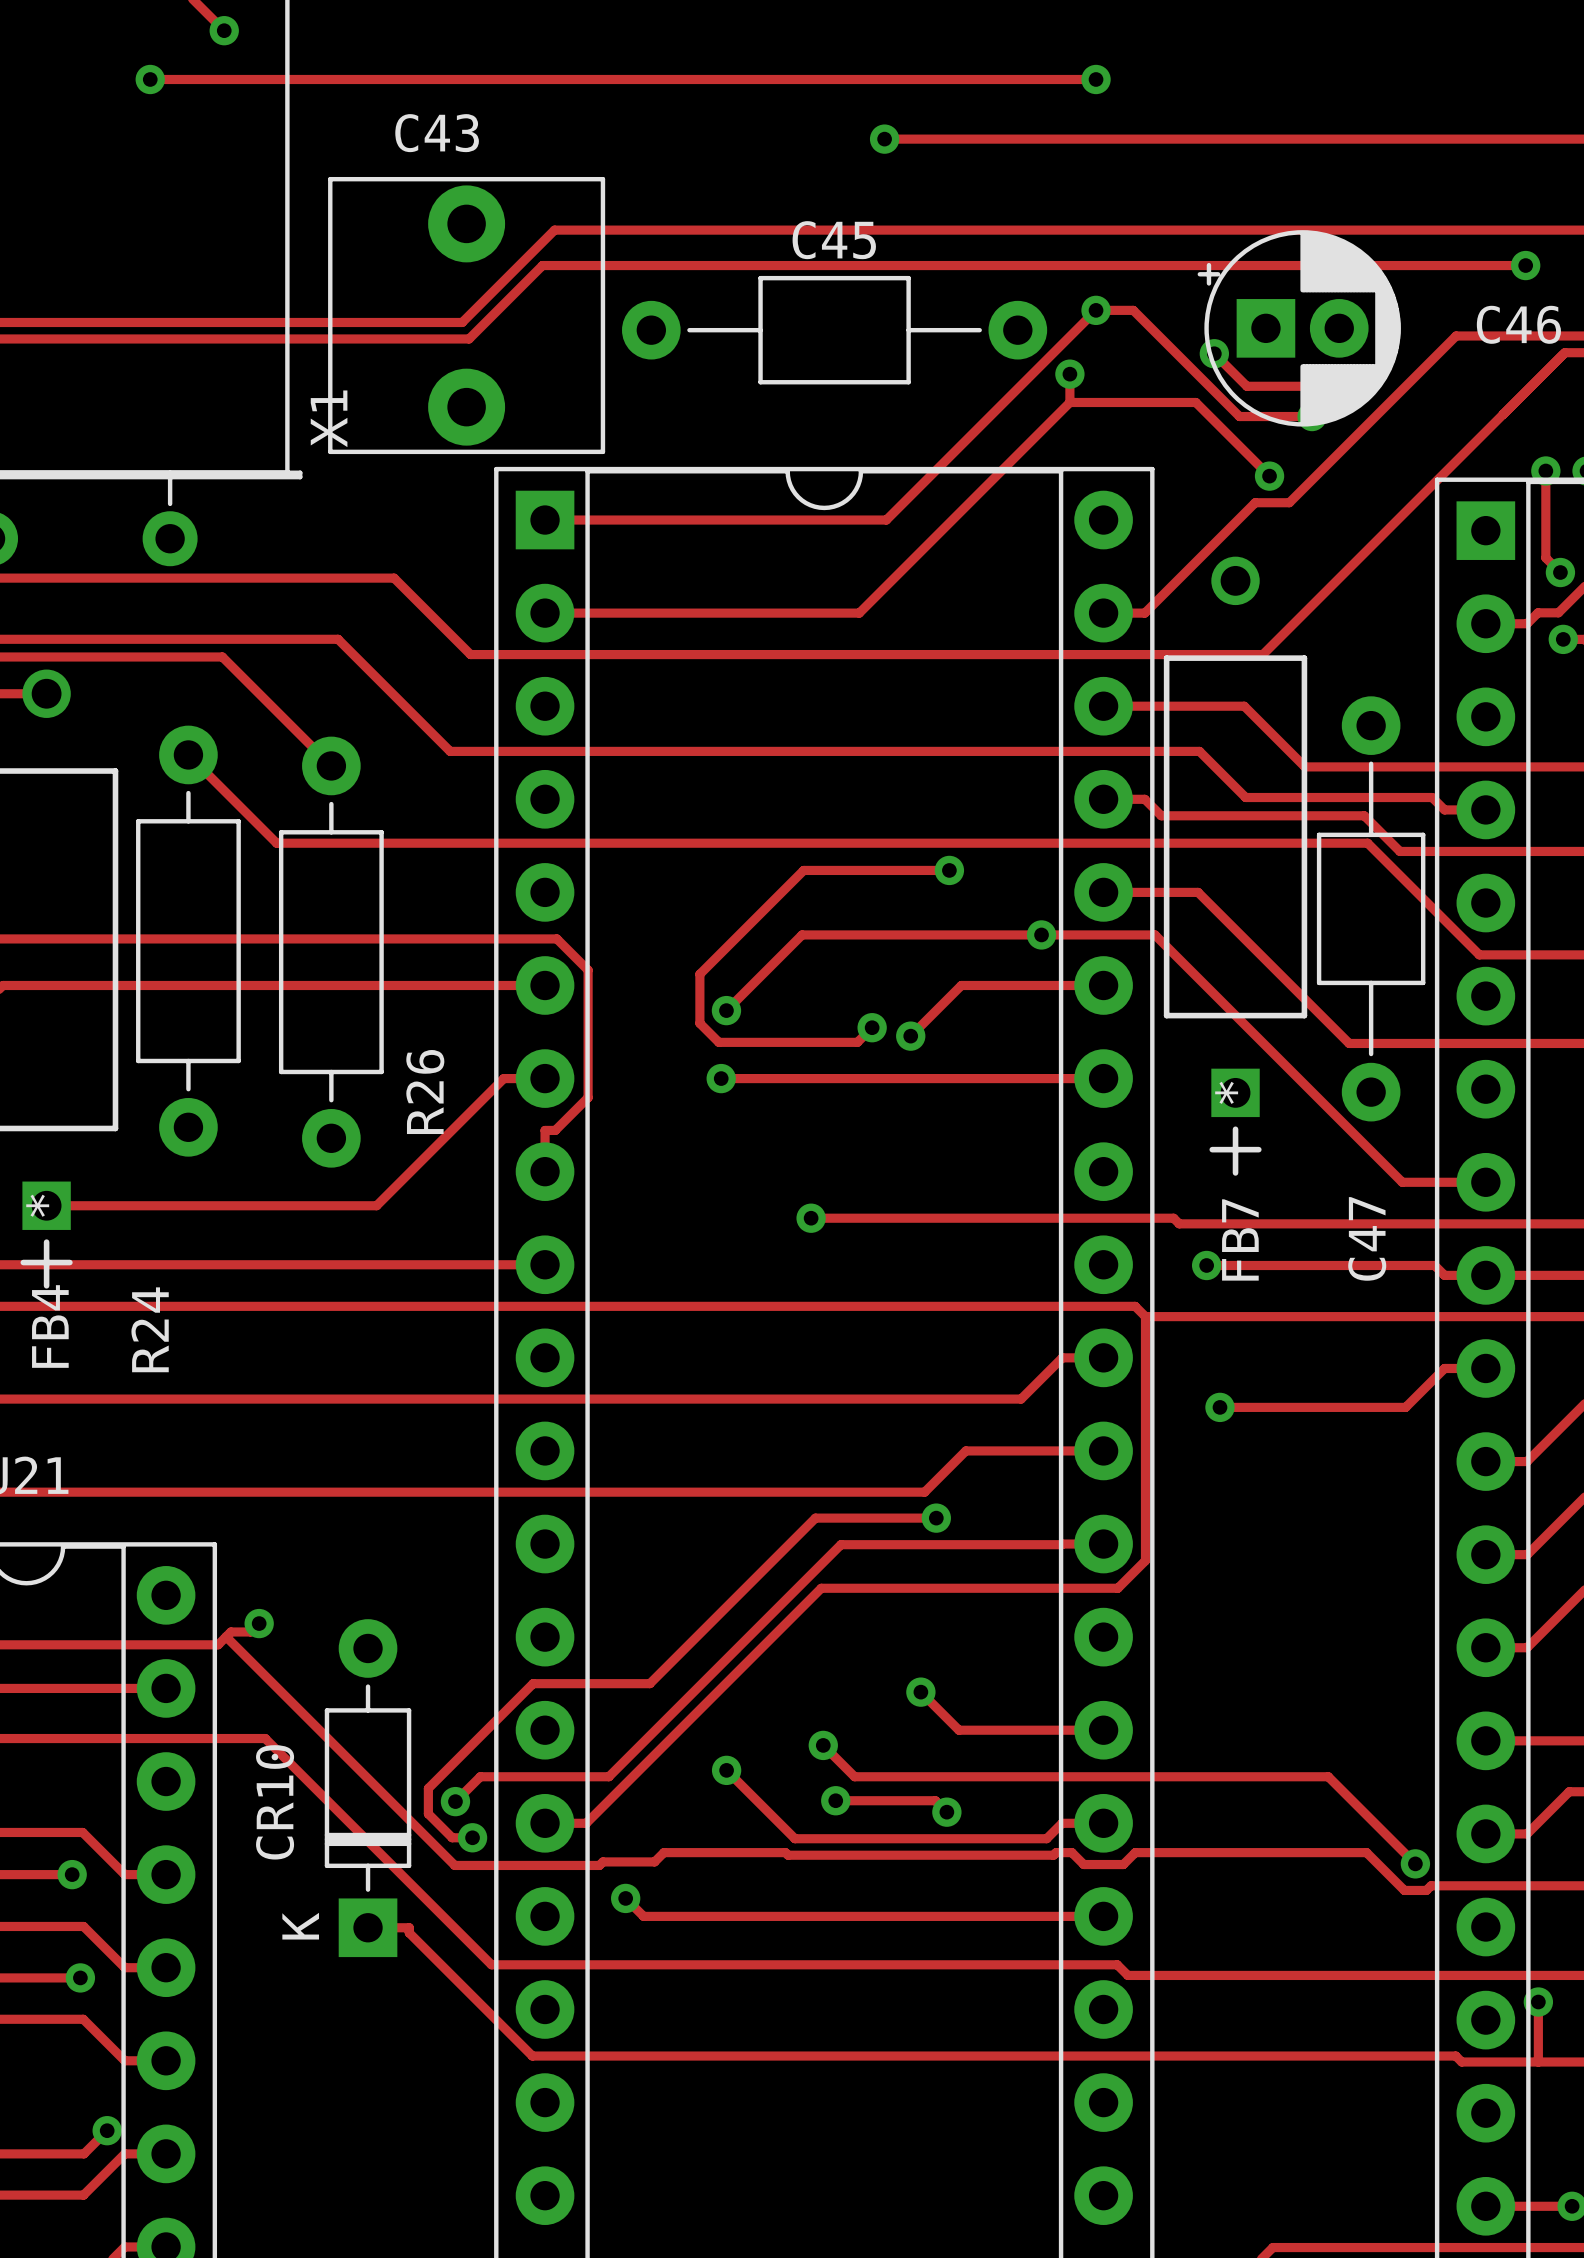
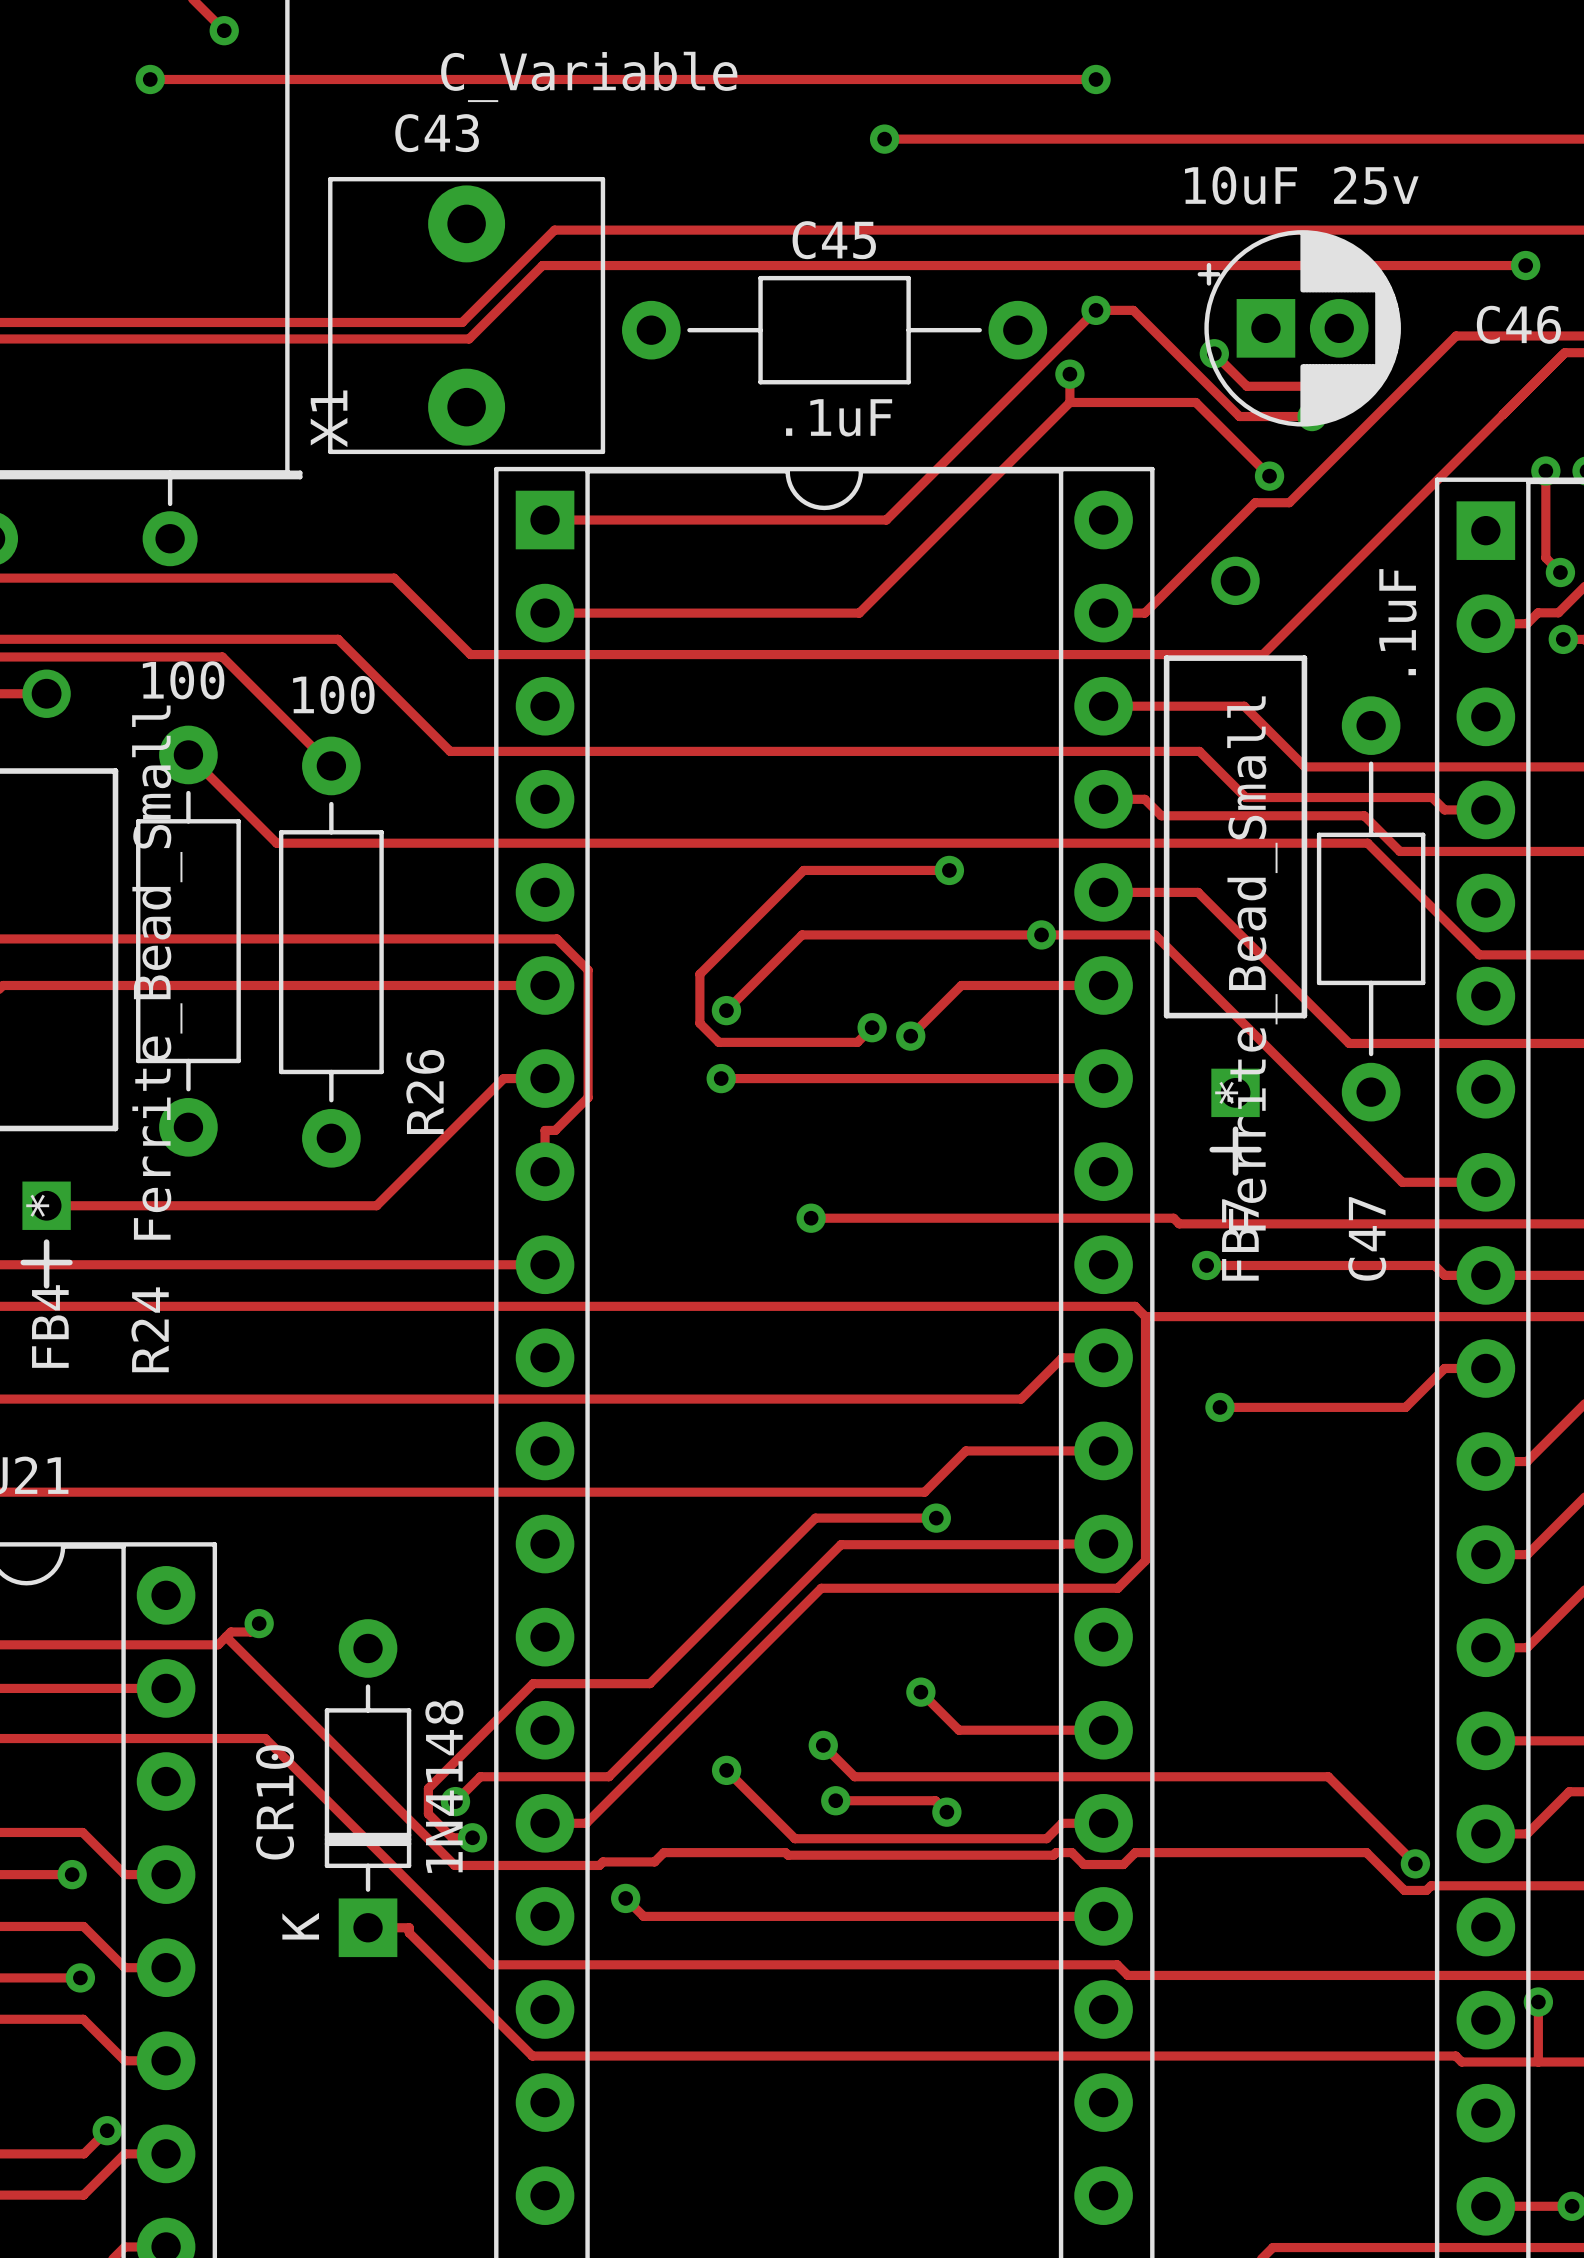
C43 value: none -> C_Variable (589, 76)
C46 value: none -> 10uF 25v (1301, 185)
C45 value: none -> .1uF (839, 417)
C47 value: none -> .1uF (1397, 622)
R24 value: none -> 100 (183, 680)
R26 value: none -> 100 (333, 694)
FB7 value: none -> Ferrite_Bead_Small (1252, 963)
FB4 value: none -> Ferrite_Bead_Small (157, 972)
CR10 value: none -> 1N4148 (444, 1786)

